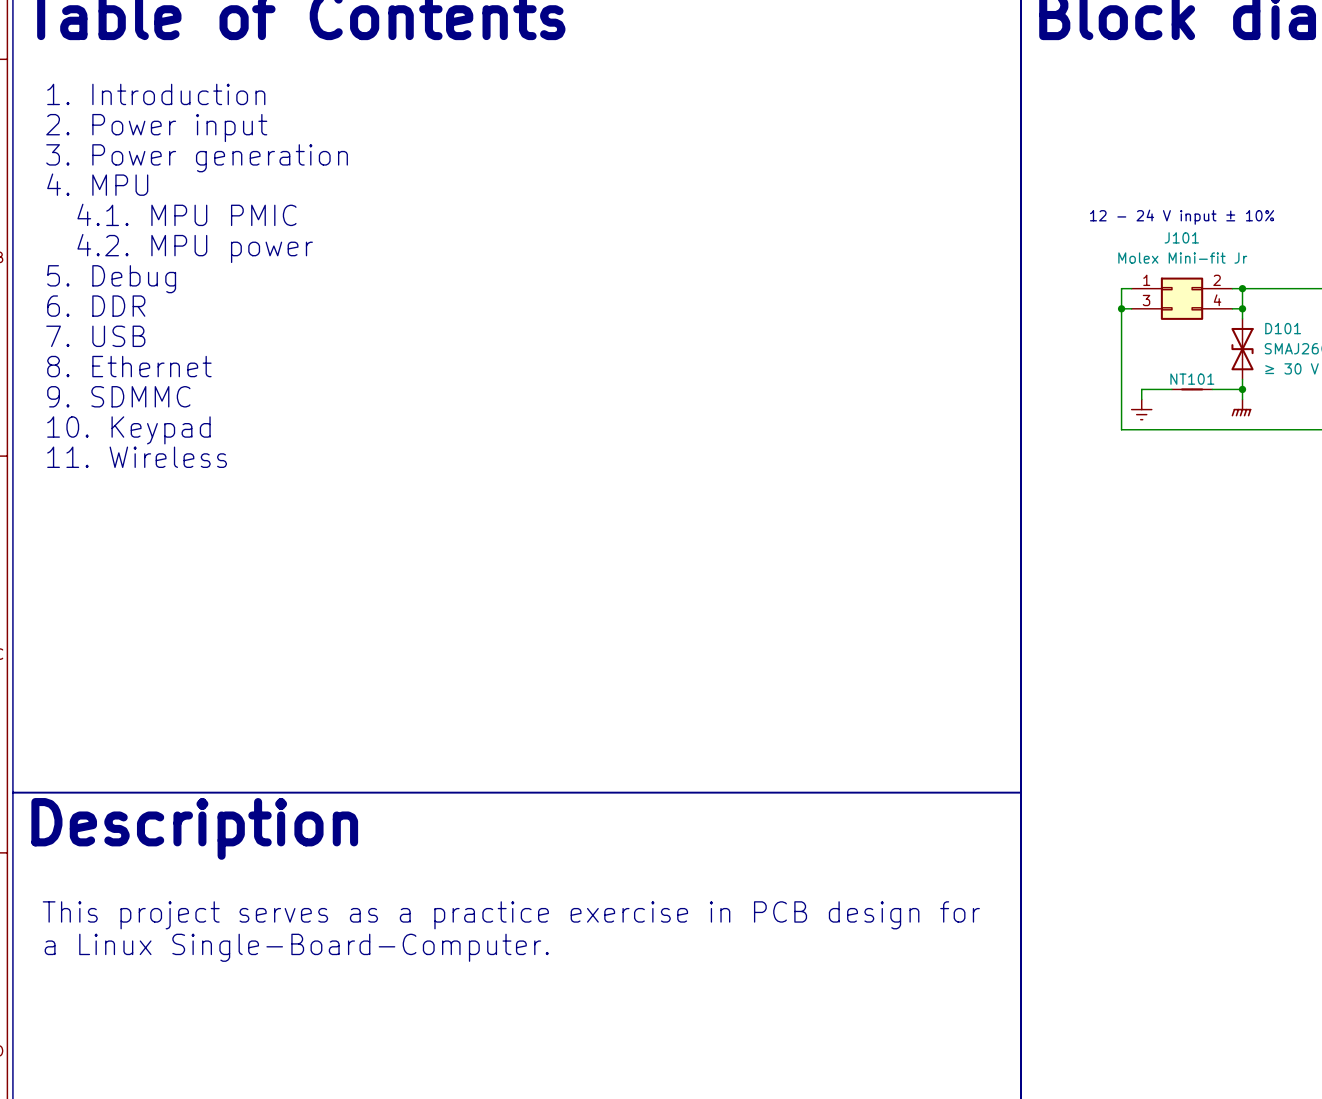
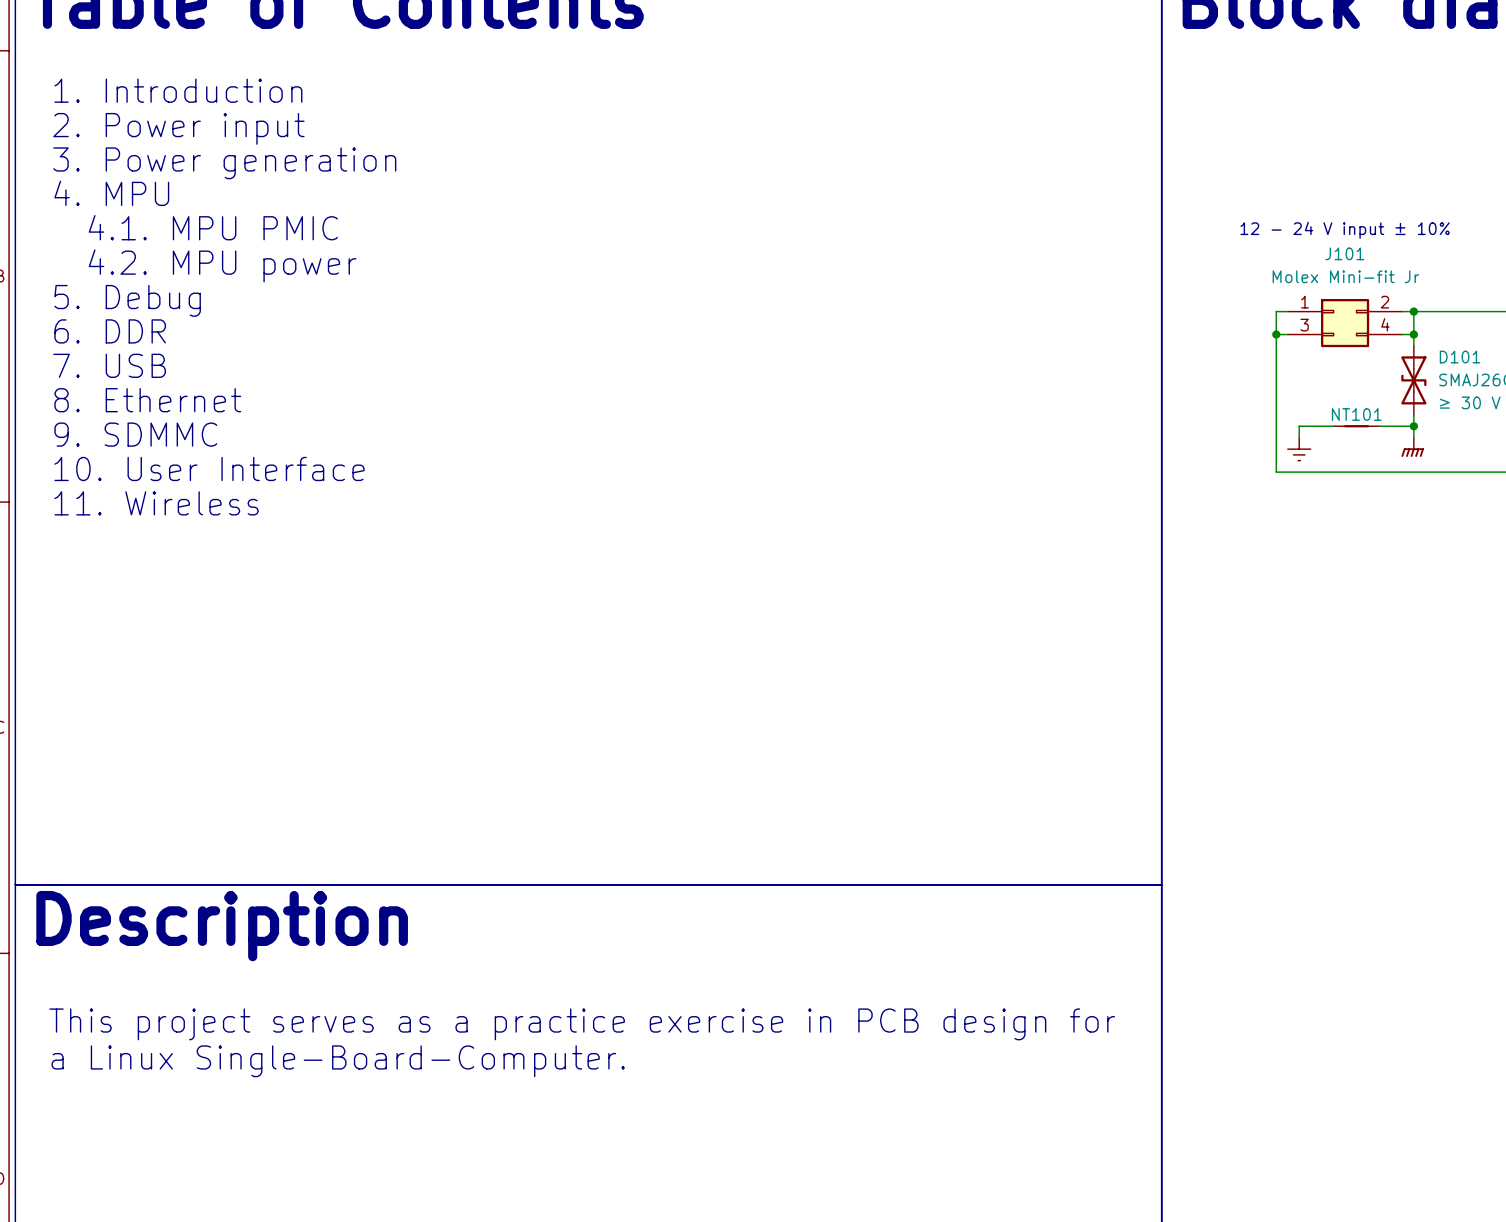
text: 10. Keypad (128, 430) -> 10. User Interface (209, 468)

